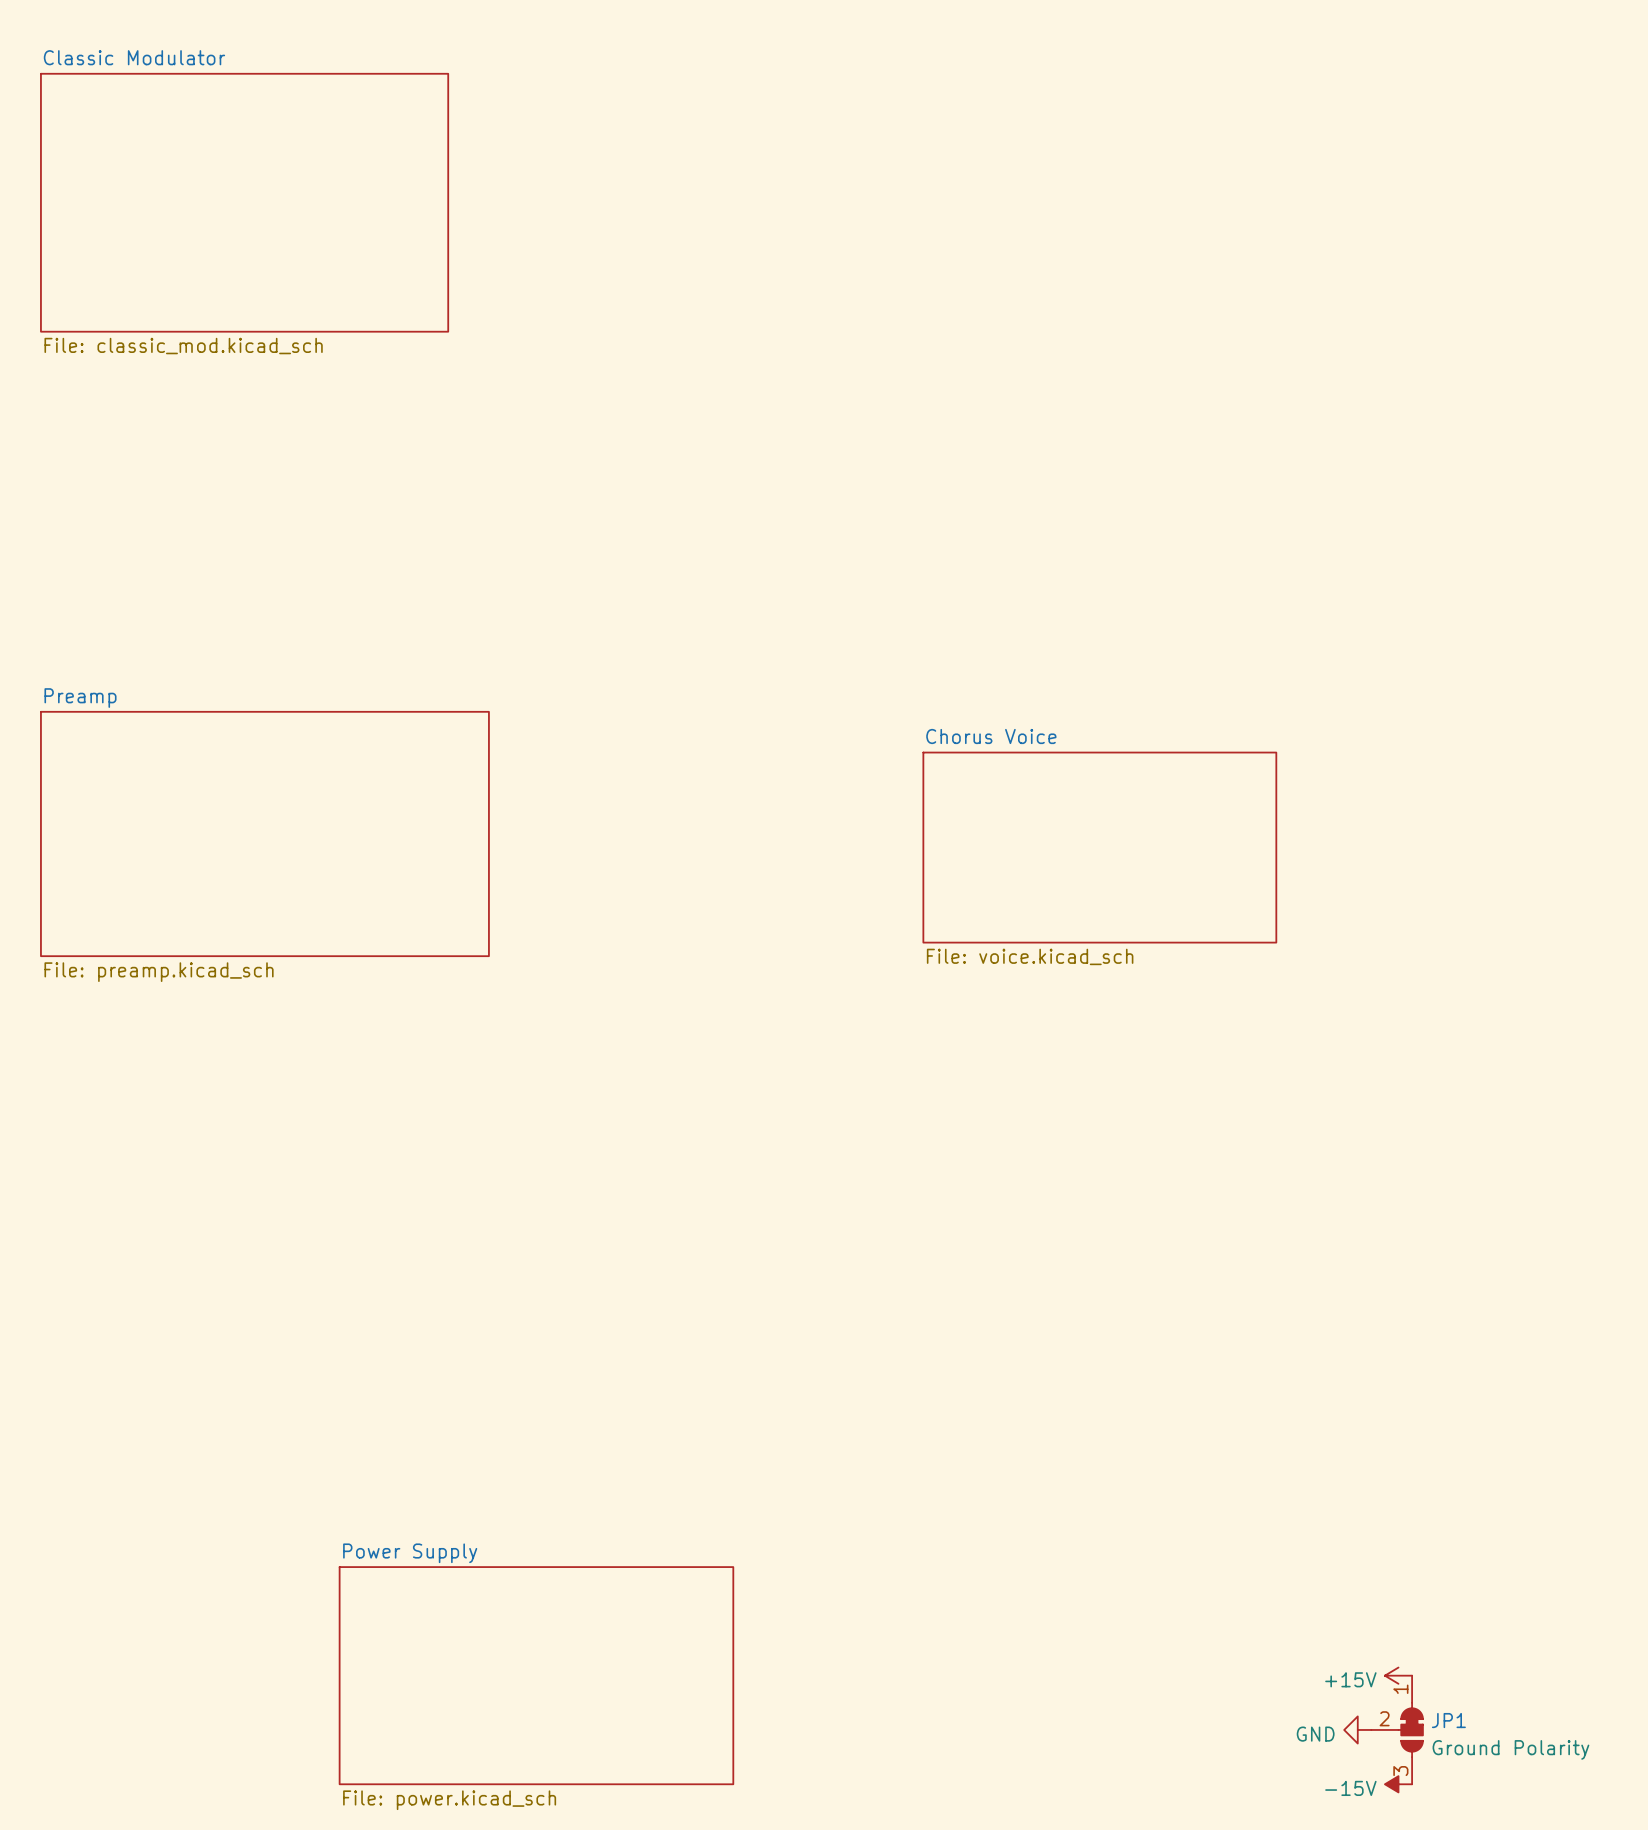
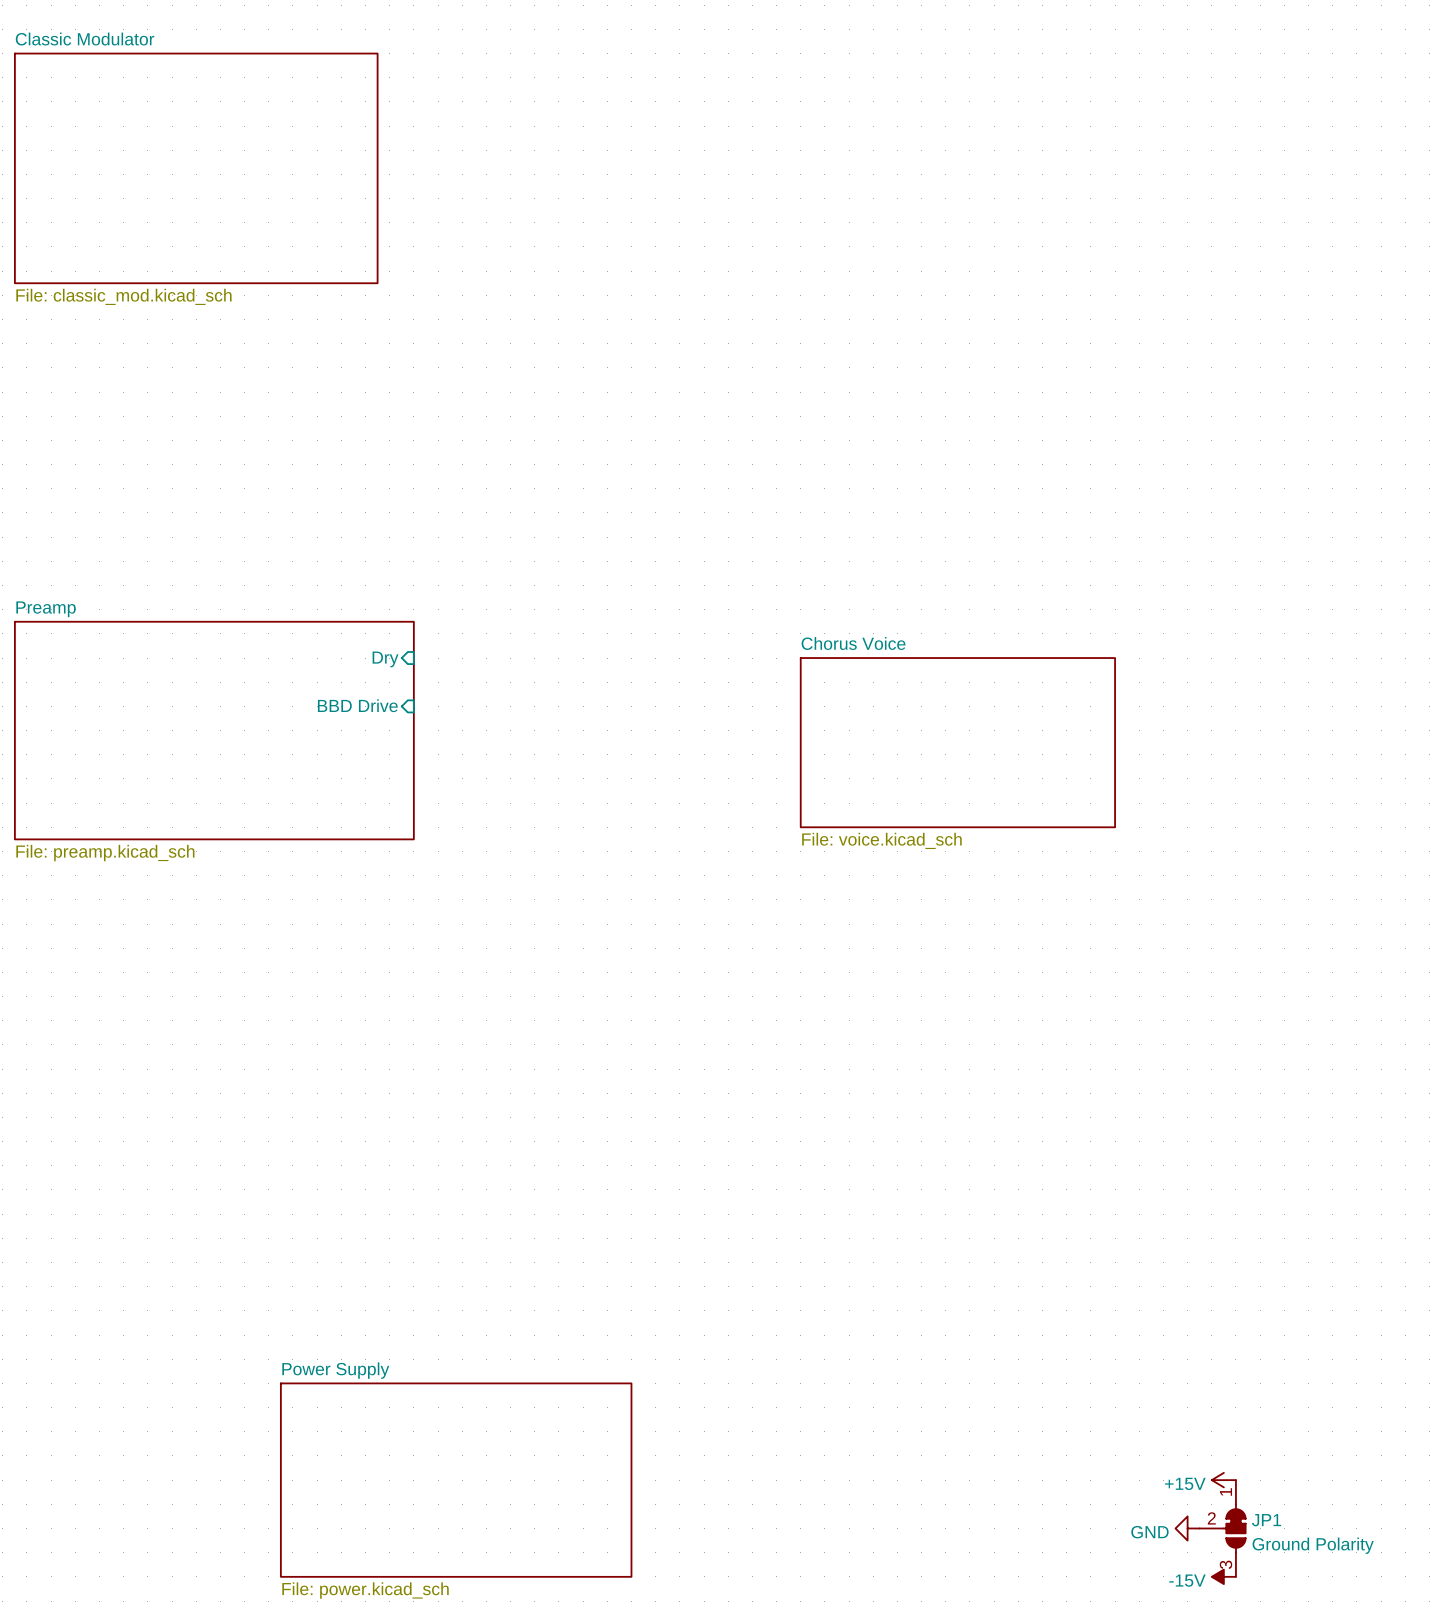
sheet pin: none -> Dry (385, 659)
sheet pin: none -> BBD Drive (357, 705)

